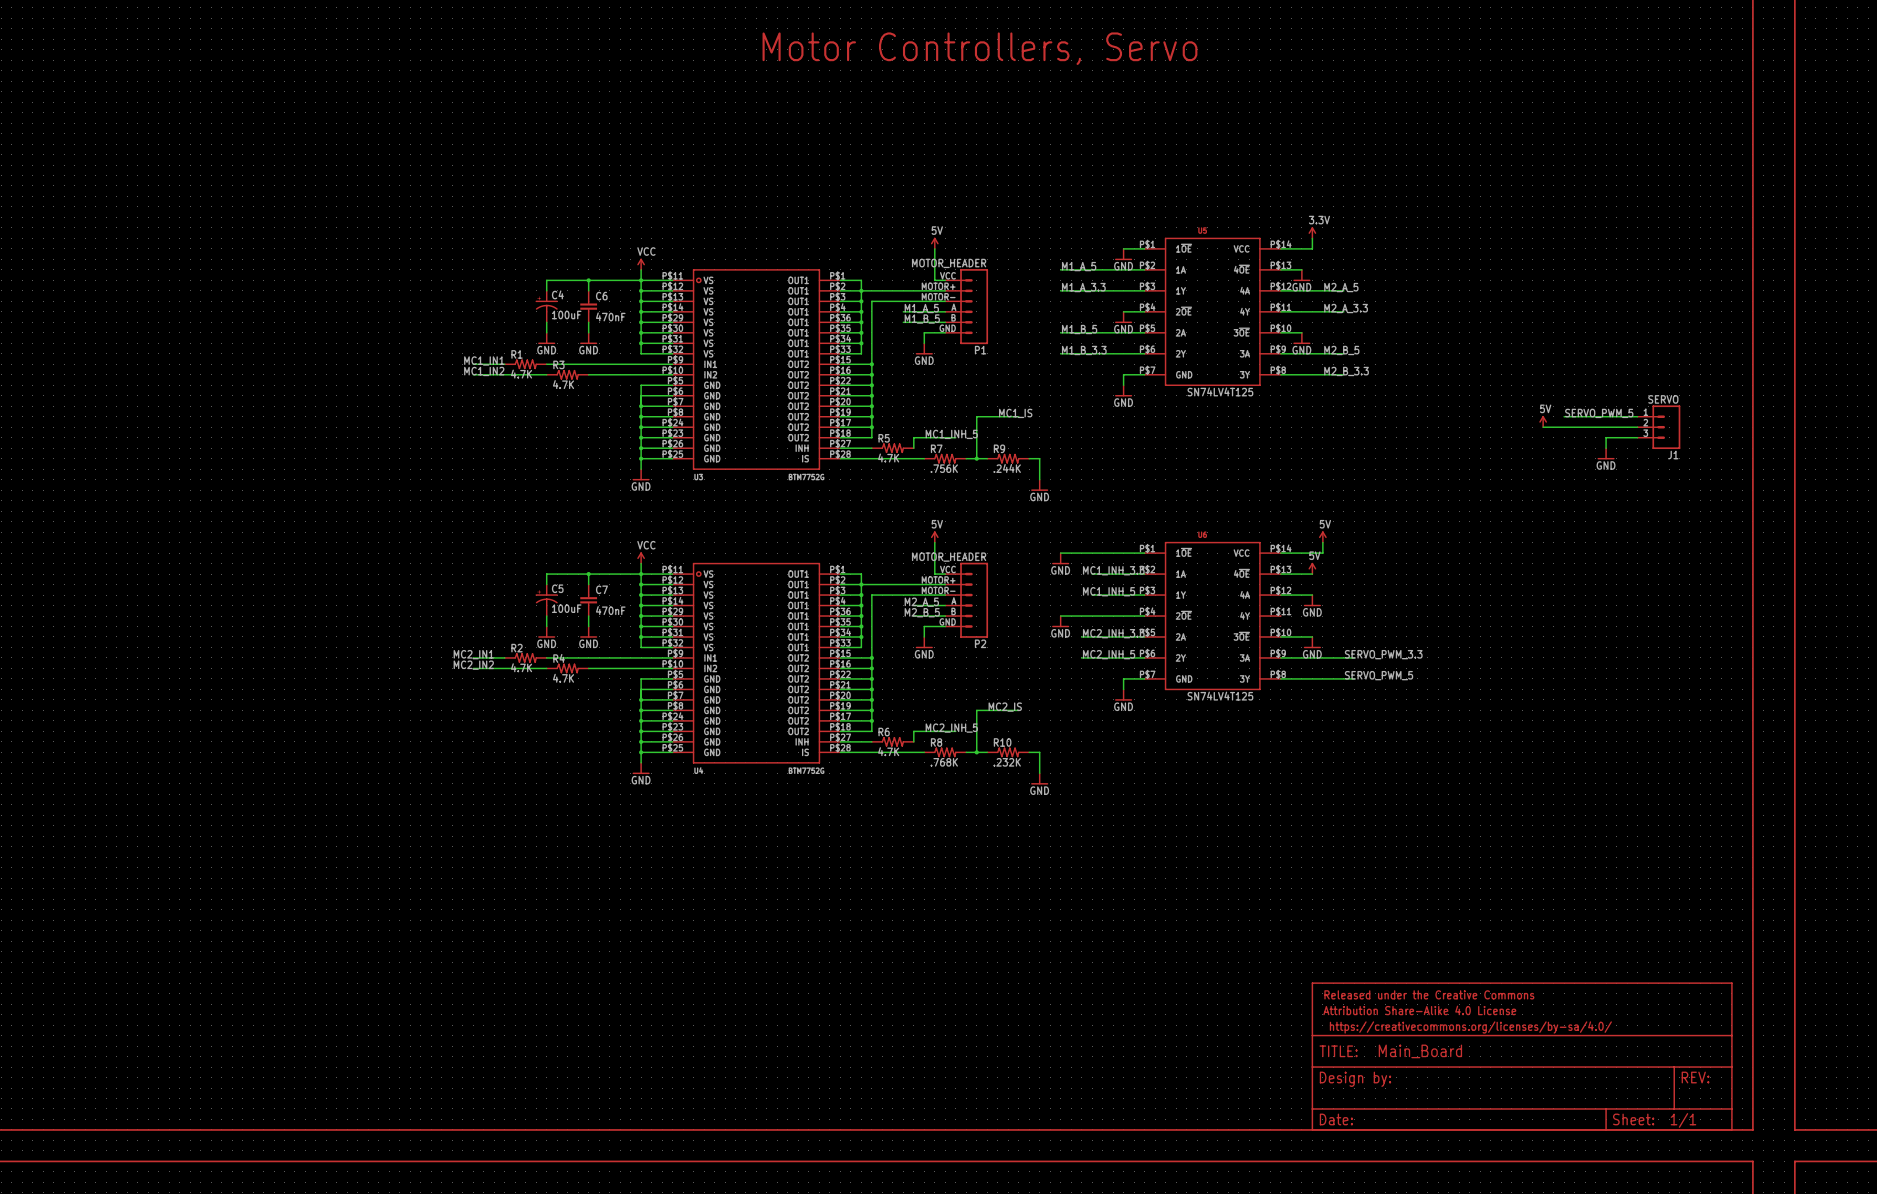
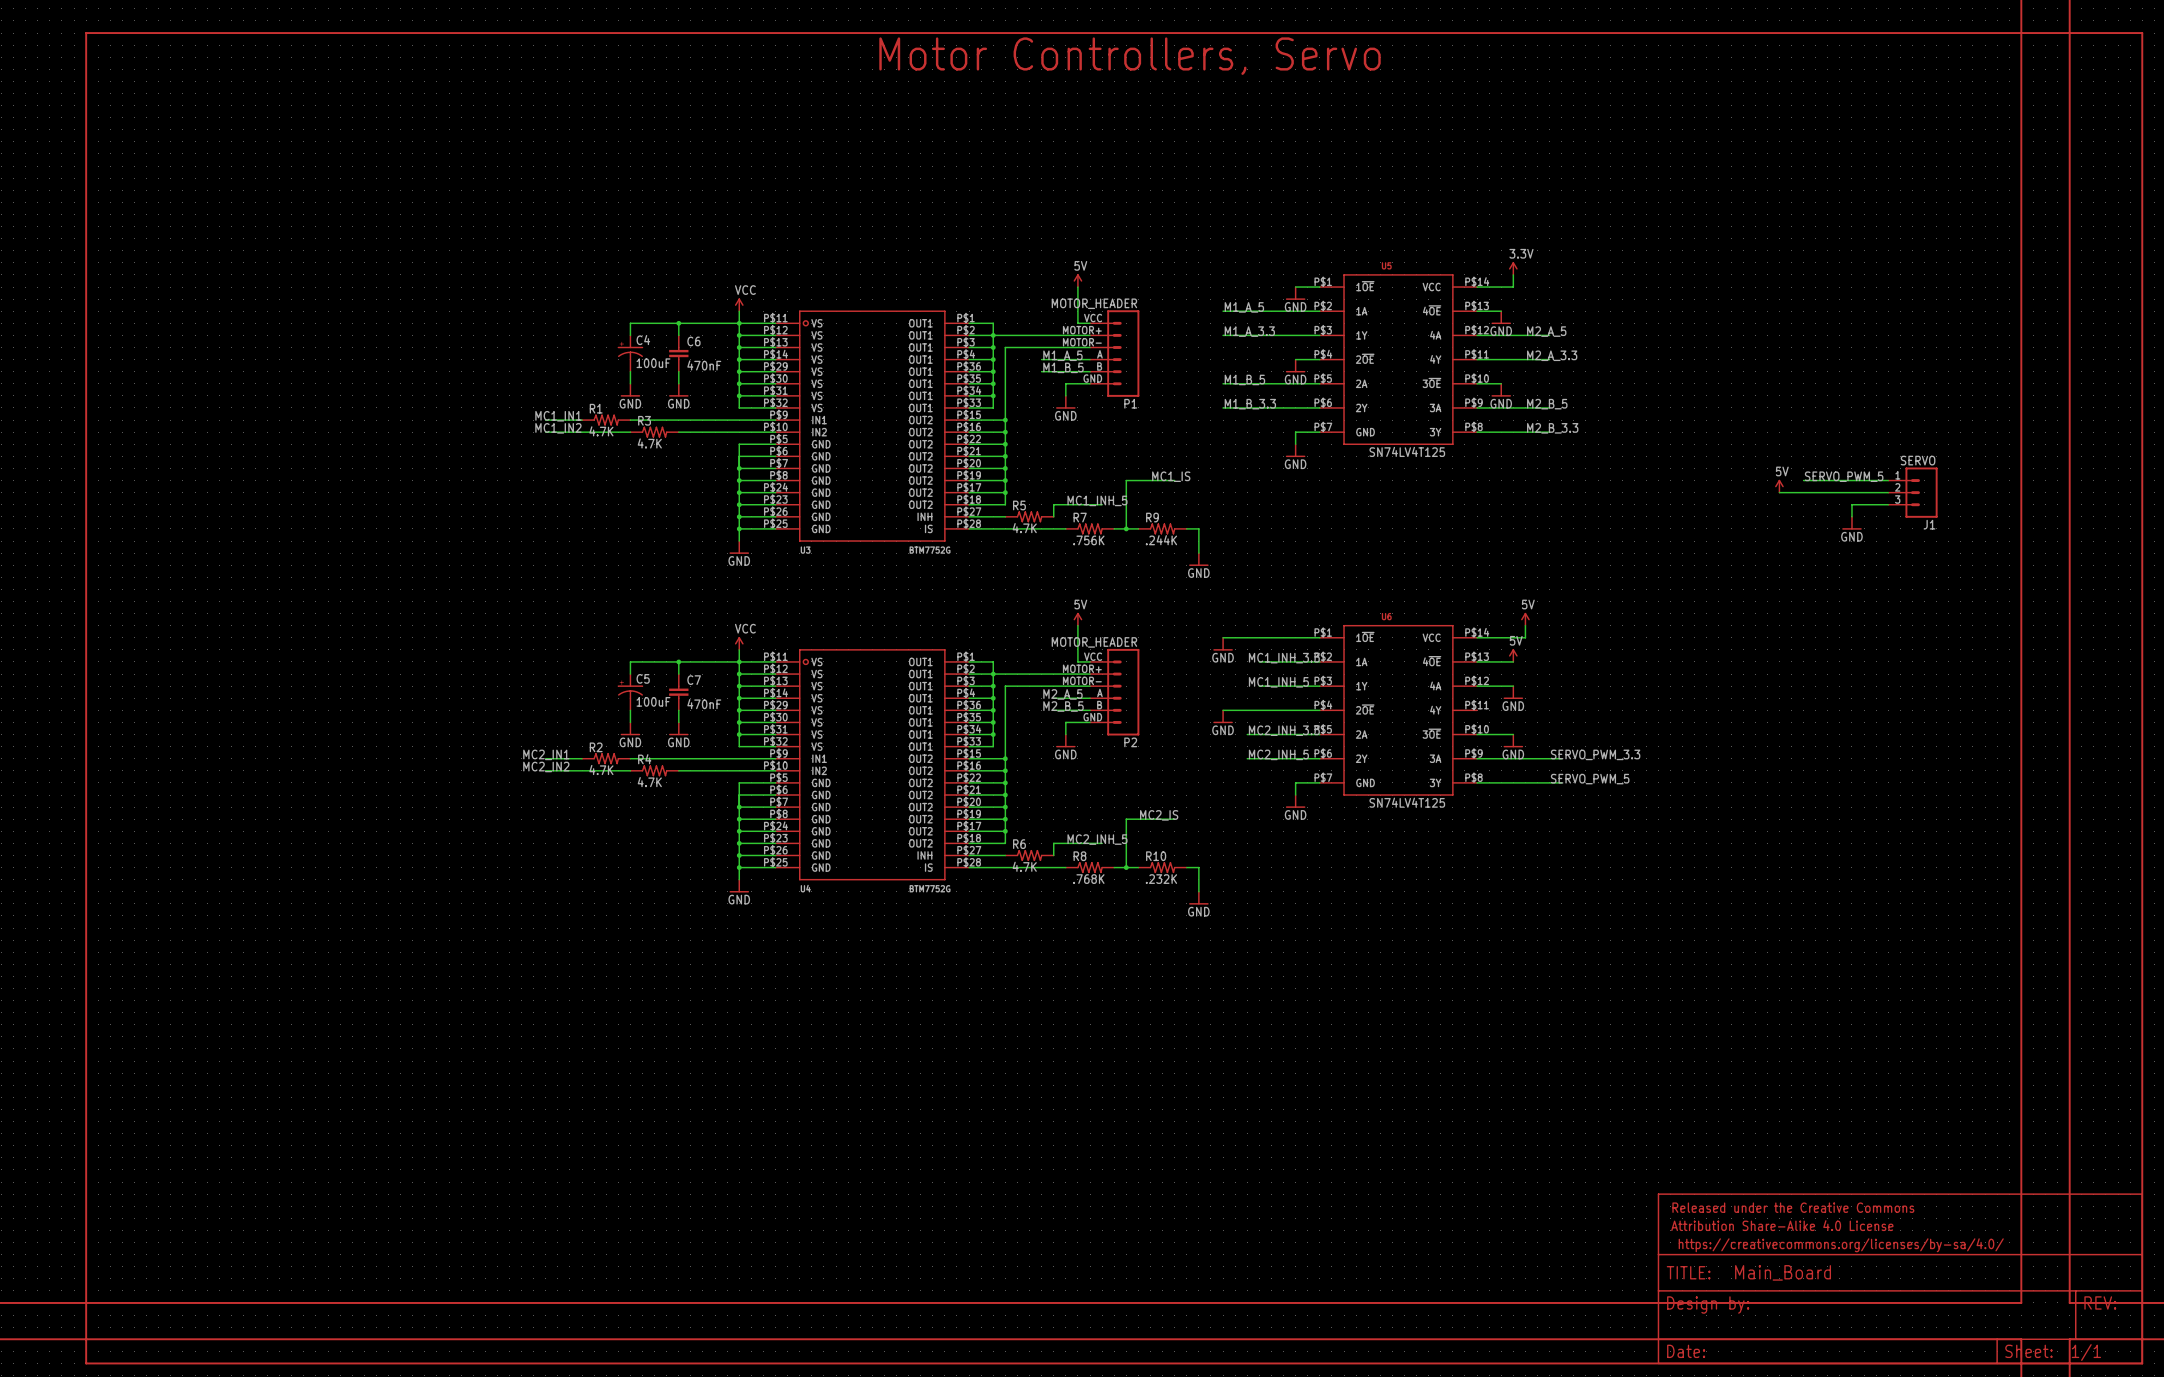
part: none -> (1114, 698)
part: (1522, 1056) -> none
part: none -> (1900, 1278)

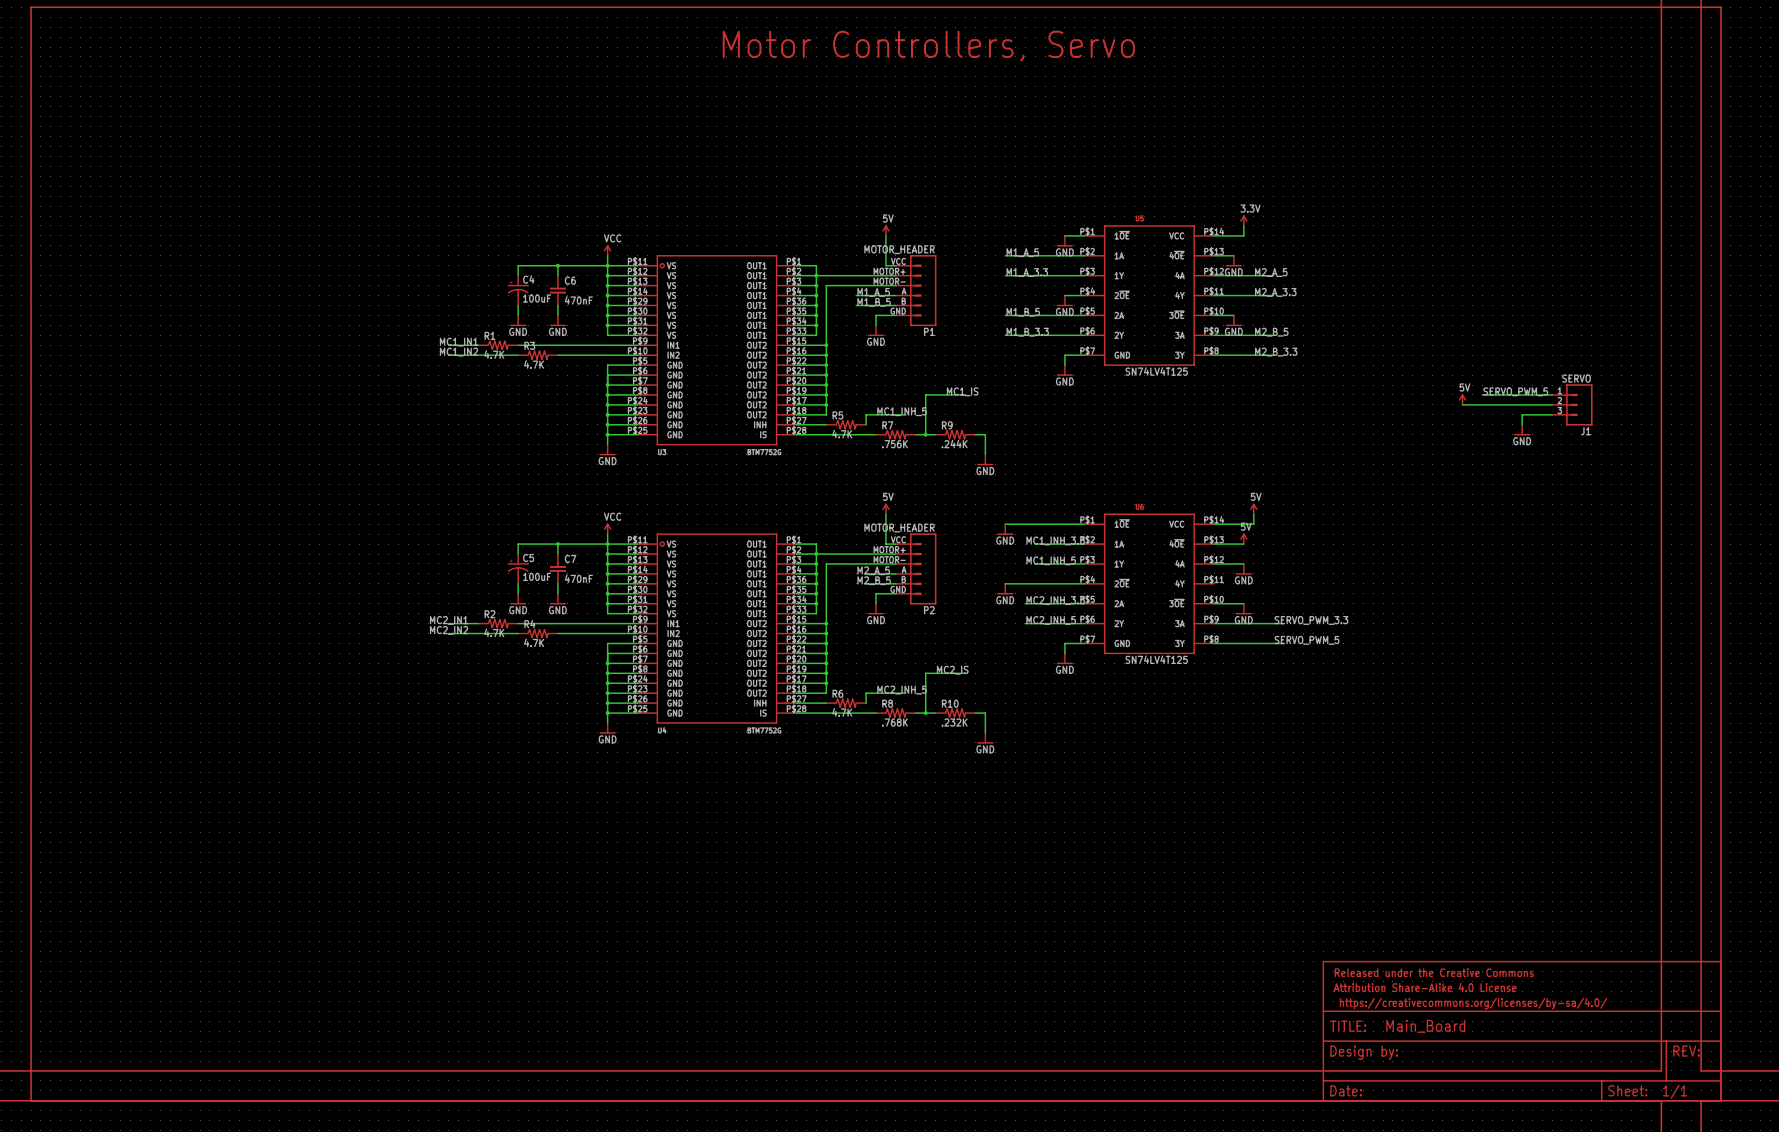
part position: (1114, 698) -> (876, 554)
part position: (1900, 1278) -> (1522, 1031)

